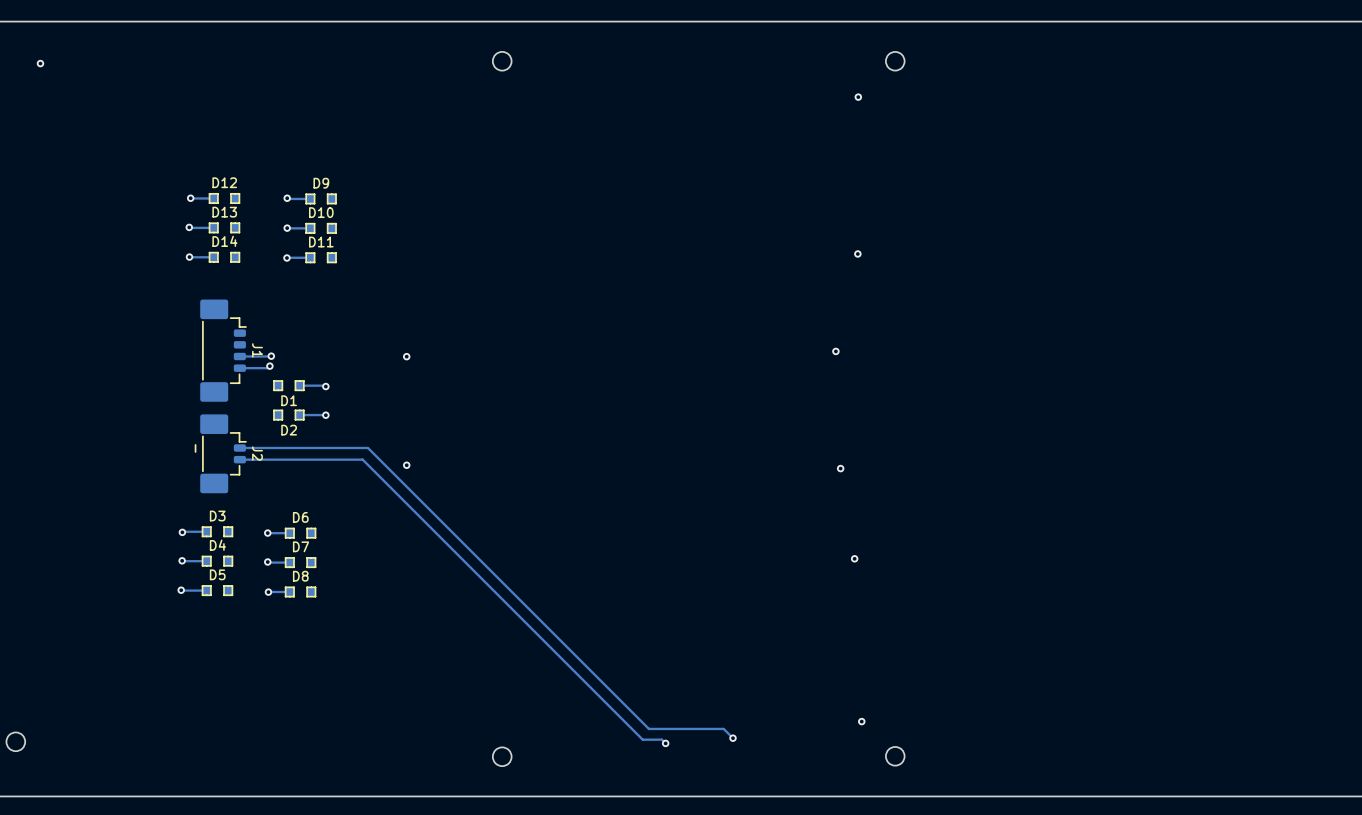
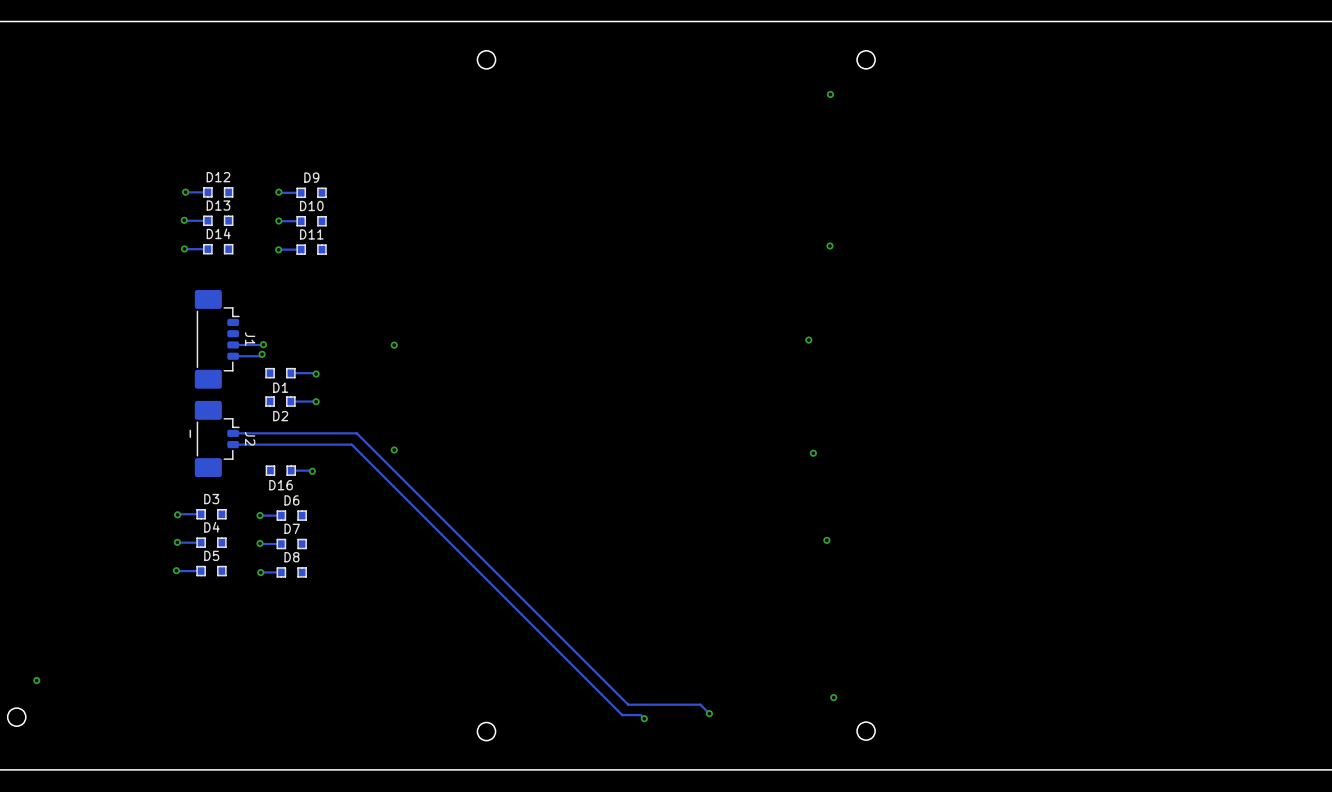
via: (40, 63) -> none
D16: none -> (280, 470)
track: none -> (291, 470) (312, 471)
via: none -> (312, 471)
via: none -> (36, 680)

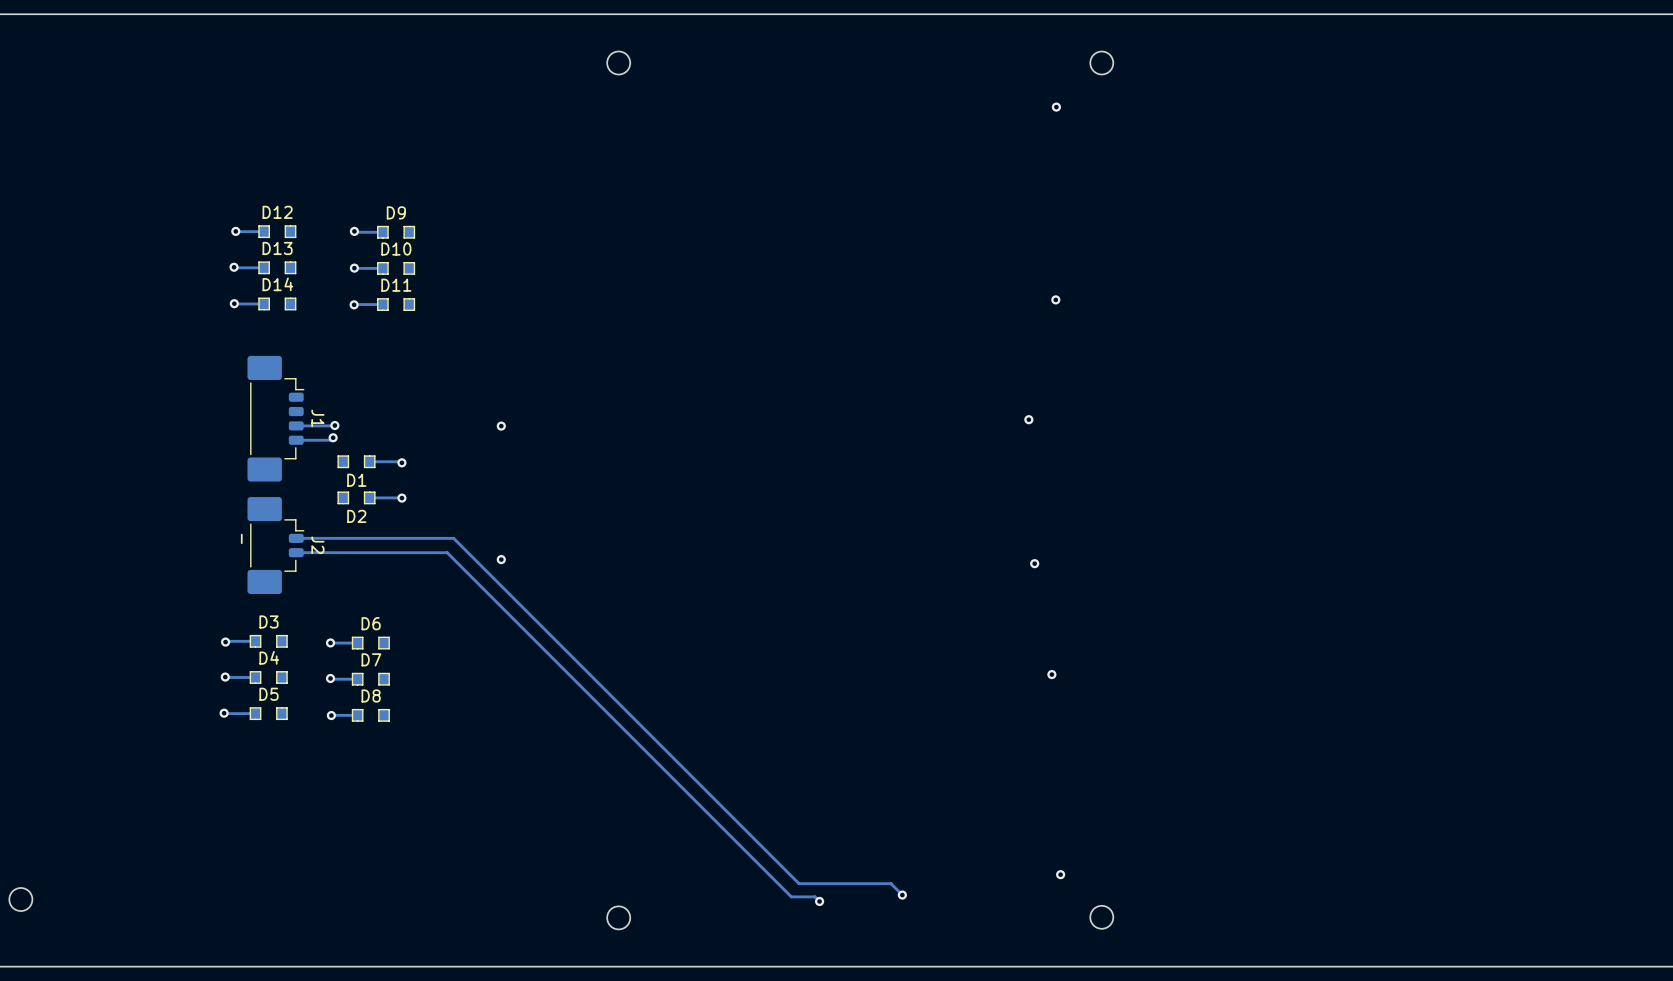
D16: (280, 470) -> none
track: (291, 470) (312, 471) -> none
via: (312, 471) -> none
via: (36, 680) -> none

